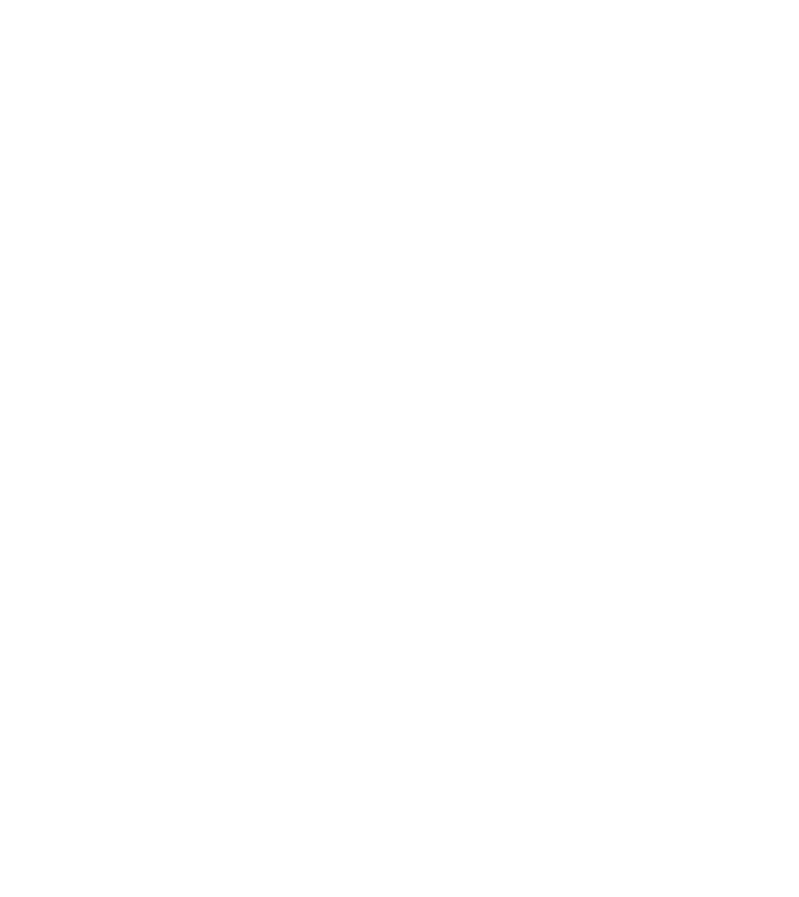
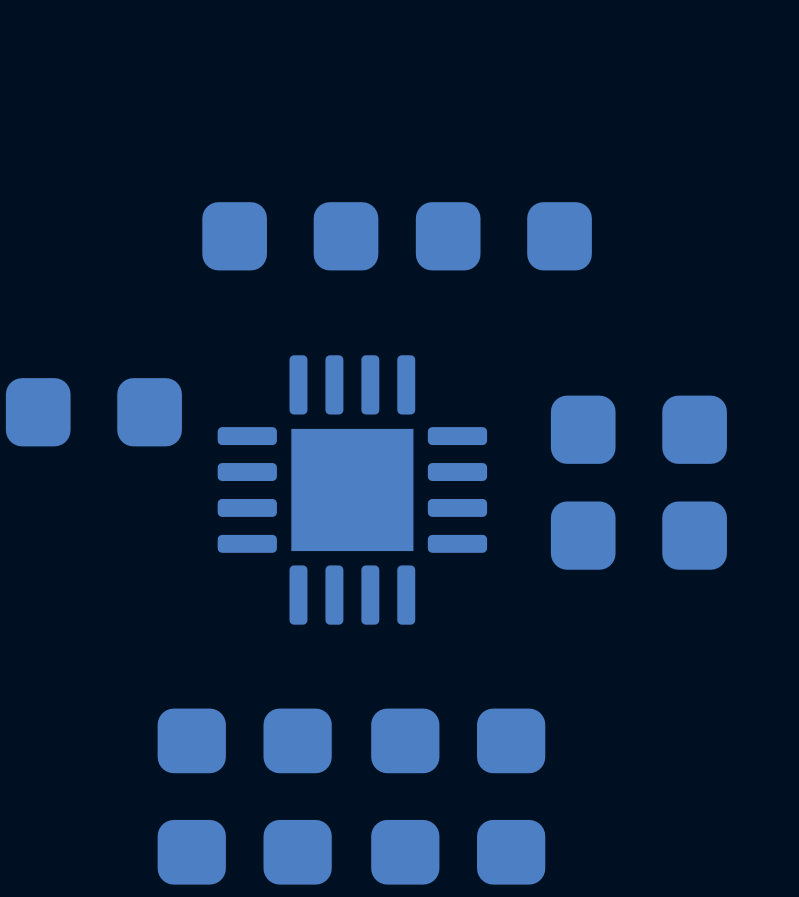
part: none -> (290, 236)
part: none -> (503, 236)
part: none -> (93, 412)
part: none -> (638, 429)
part: none -> (352, 489)
part: none -> (638, 535)
part: none -> (191, 796)
part: none -> (297, 796)
part: none -> (405, 796)
part: none -> (511, 796)

